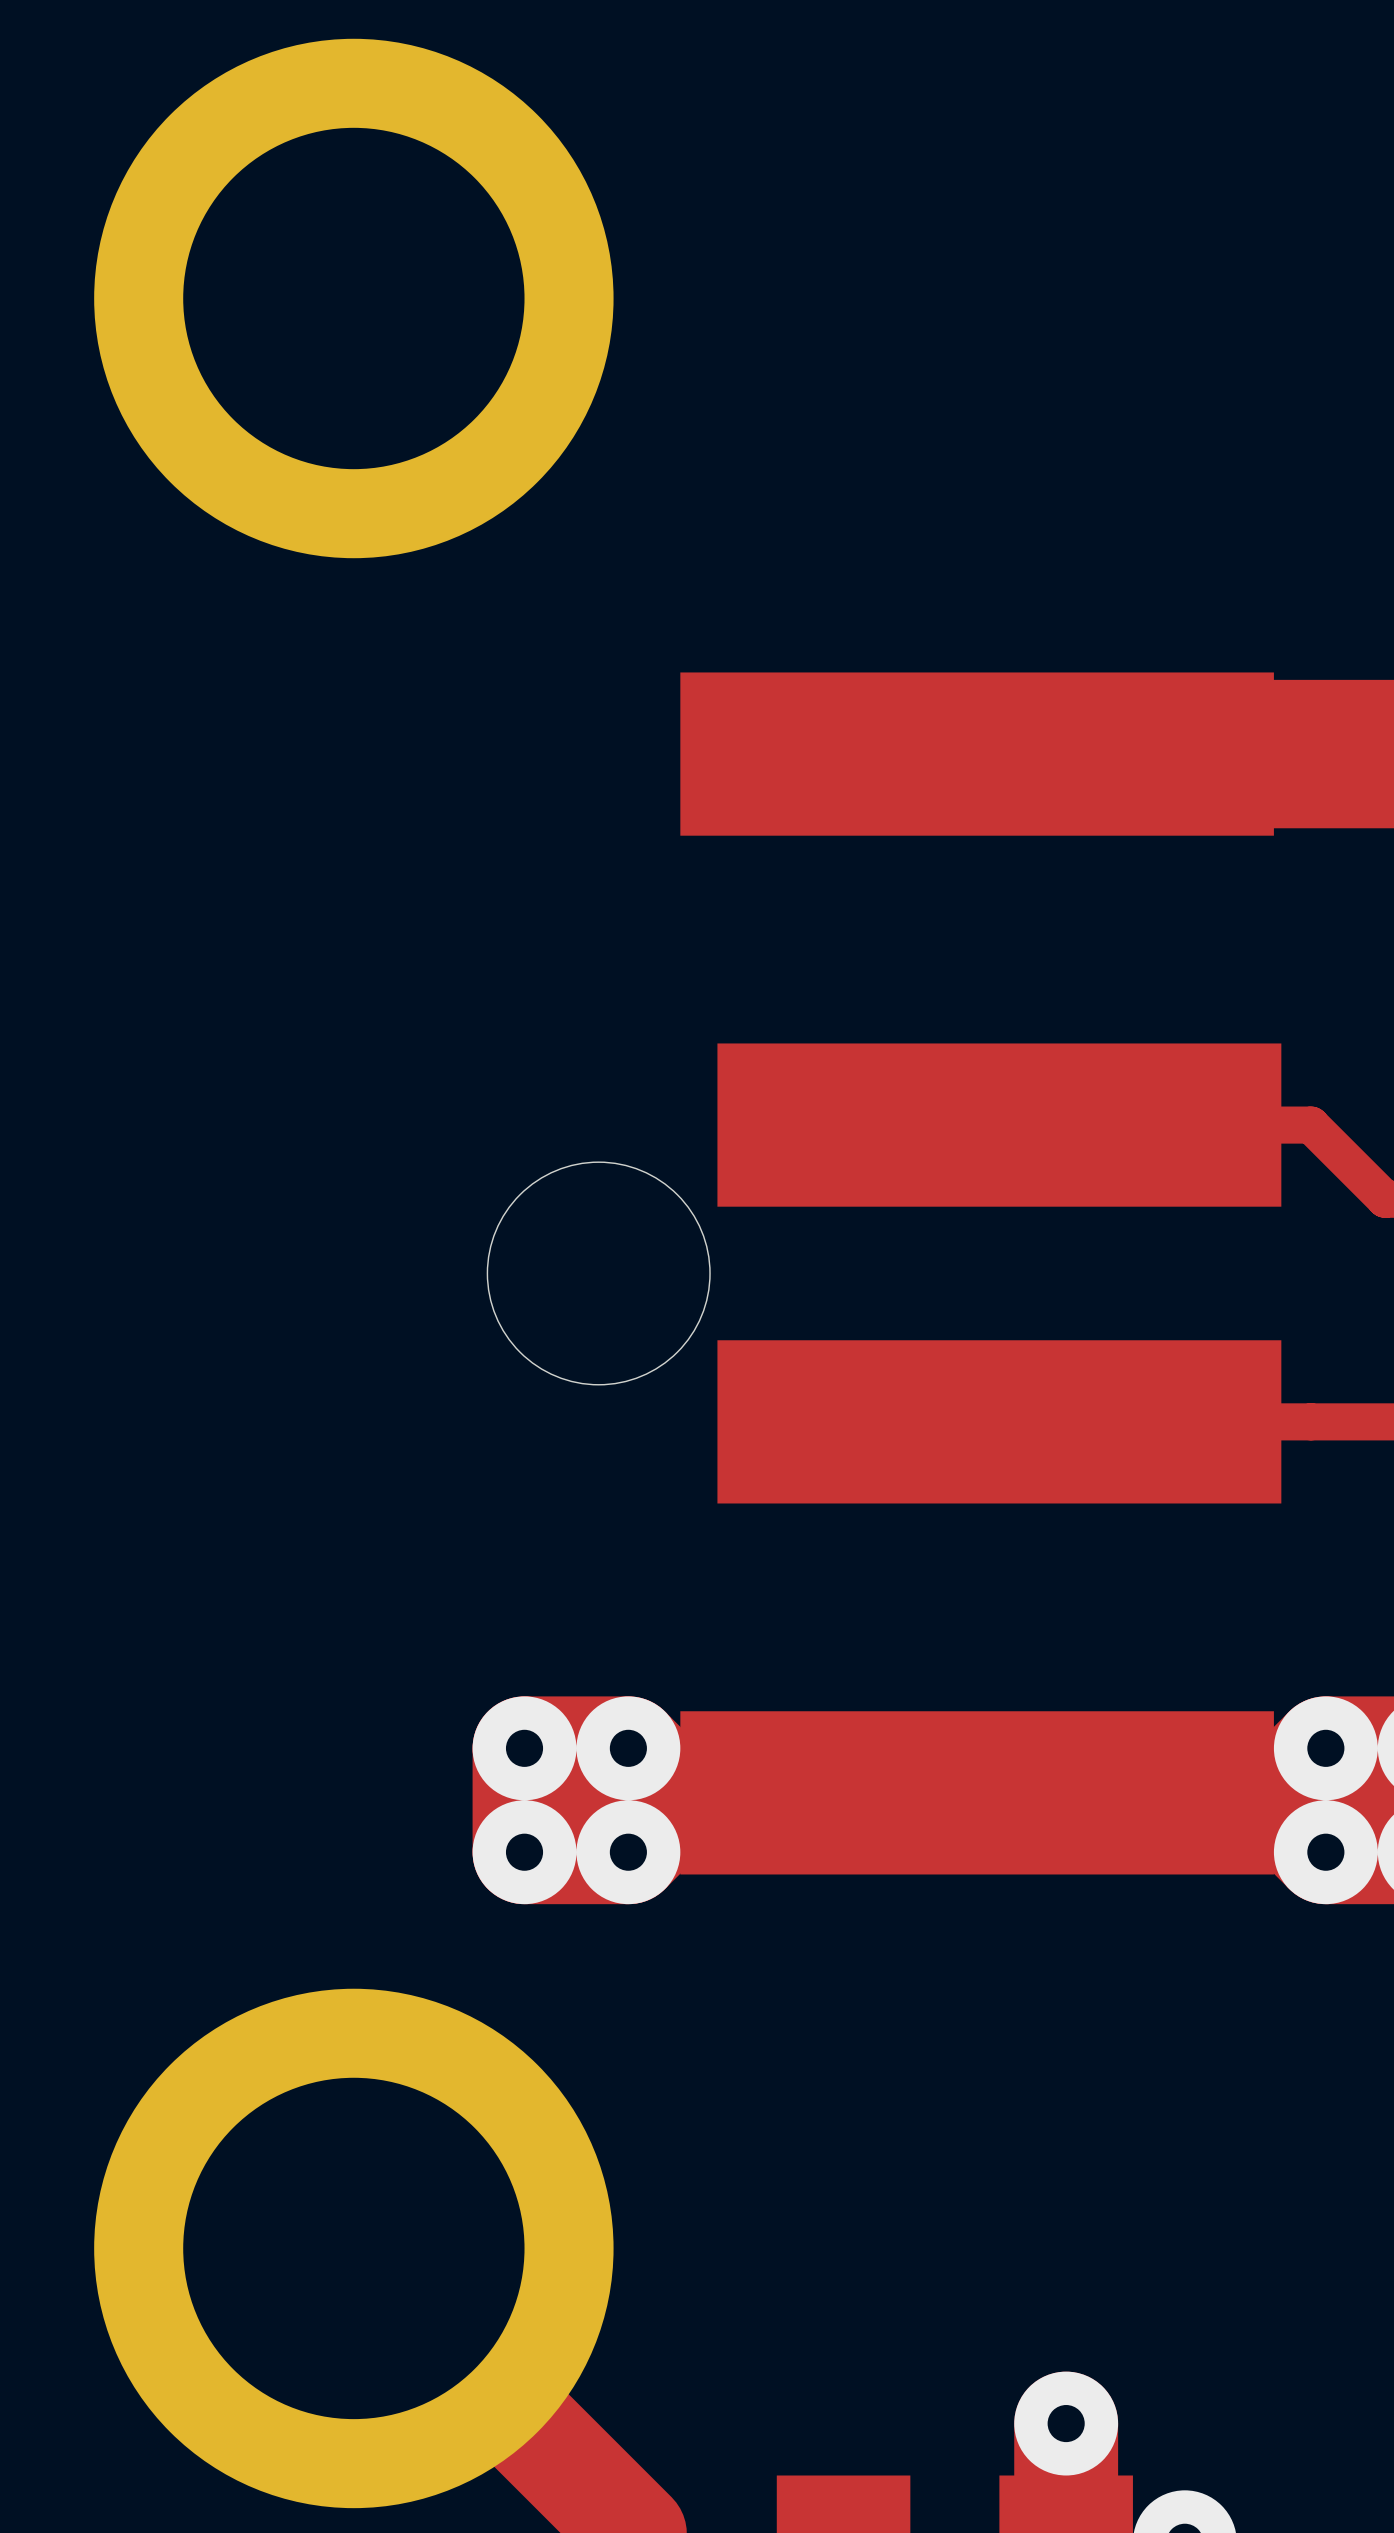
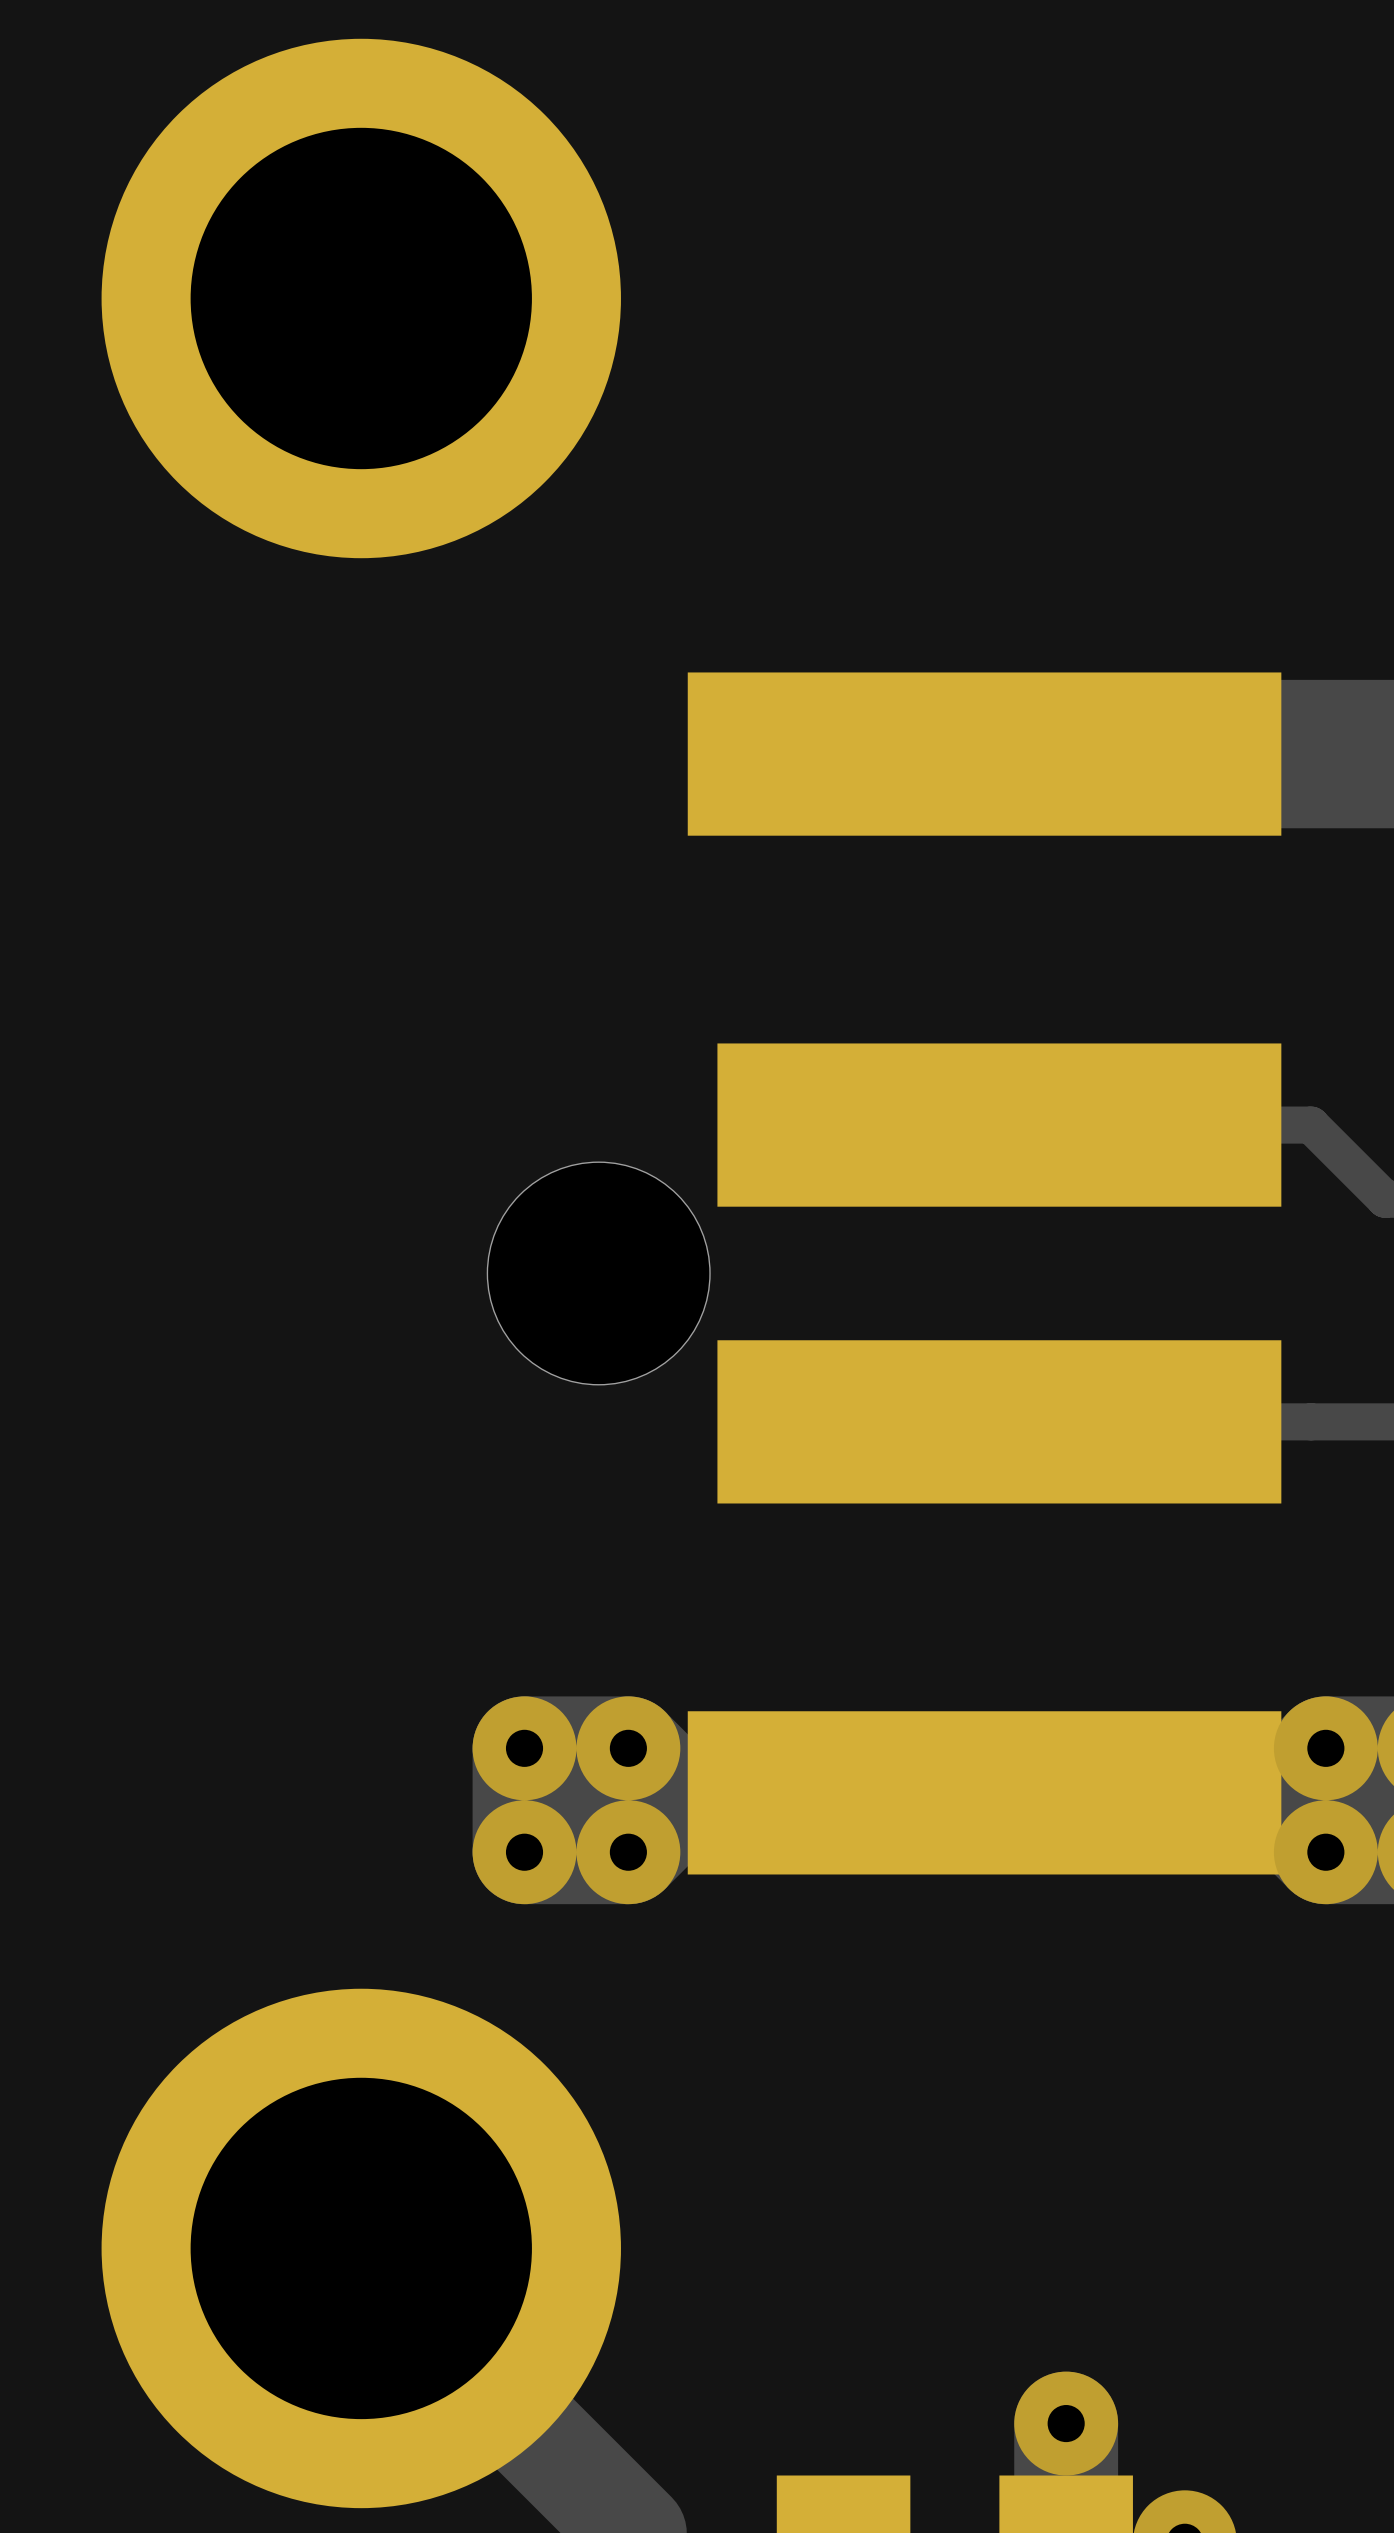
part footprint: [94, 38, 1282, 2509] -> [101, 38, 1282, 2509]

